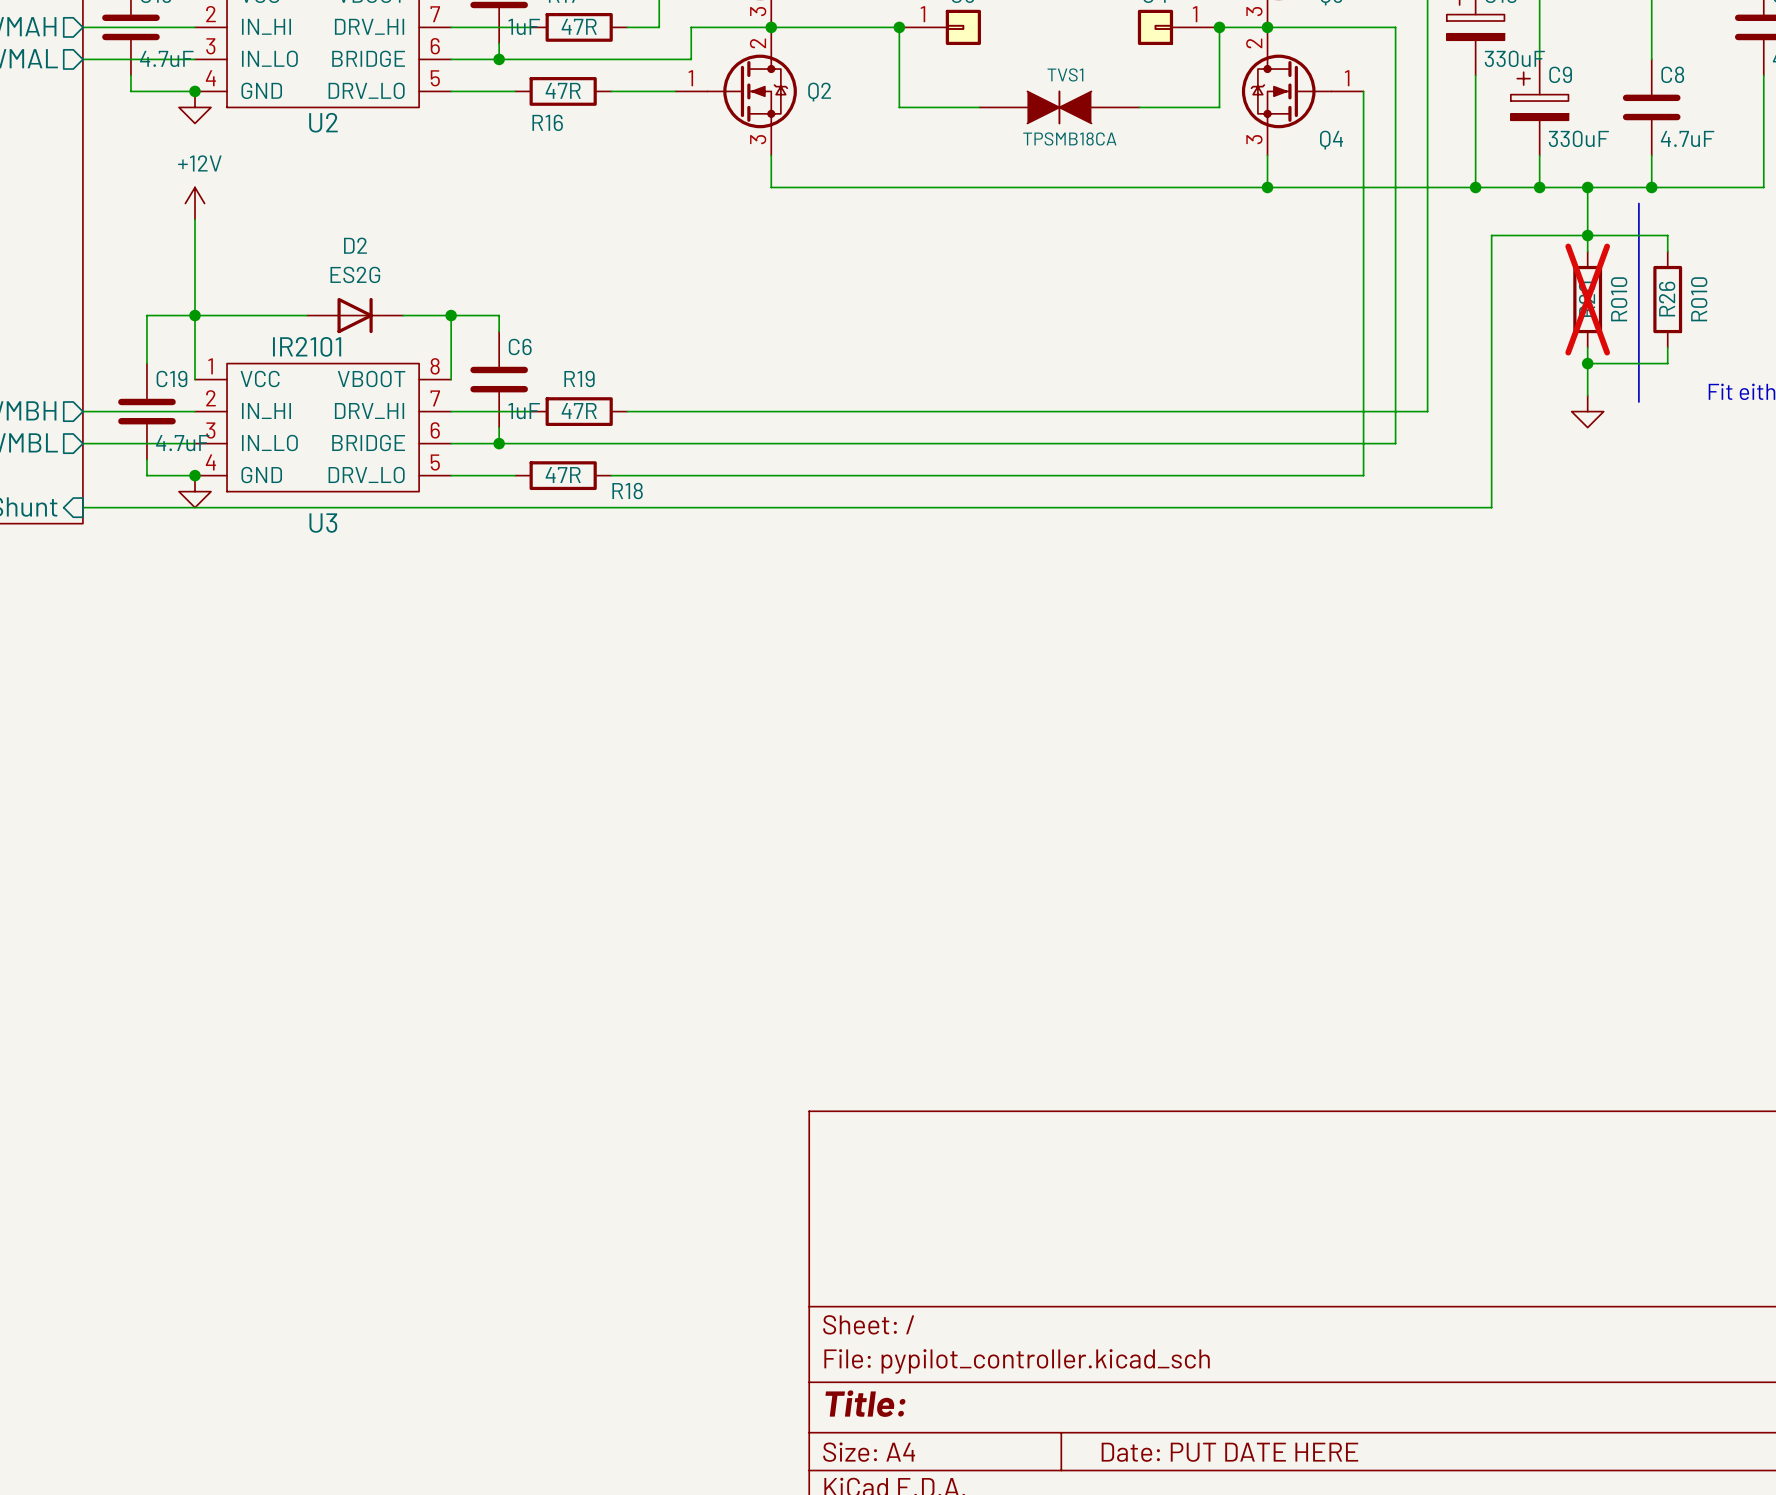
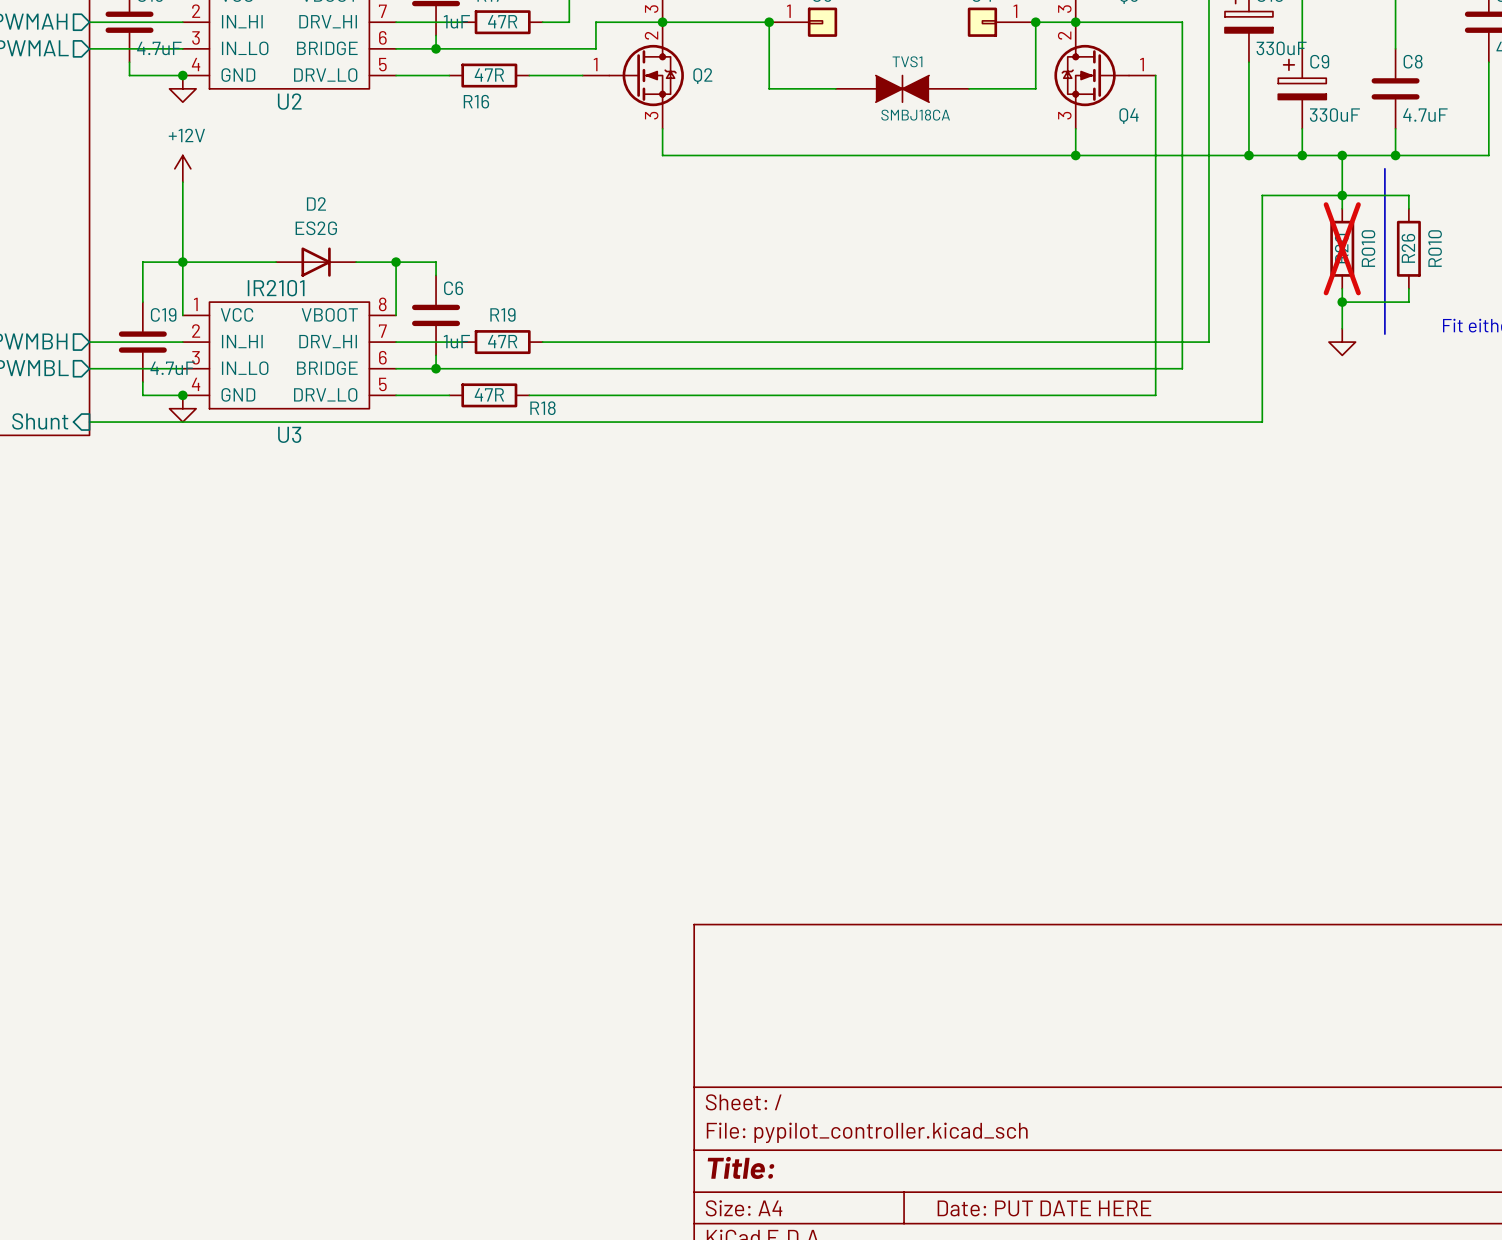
TVS1 value: TPSMB18CA (1069, 138) -> SMBJ18CA (915, 115)

